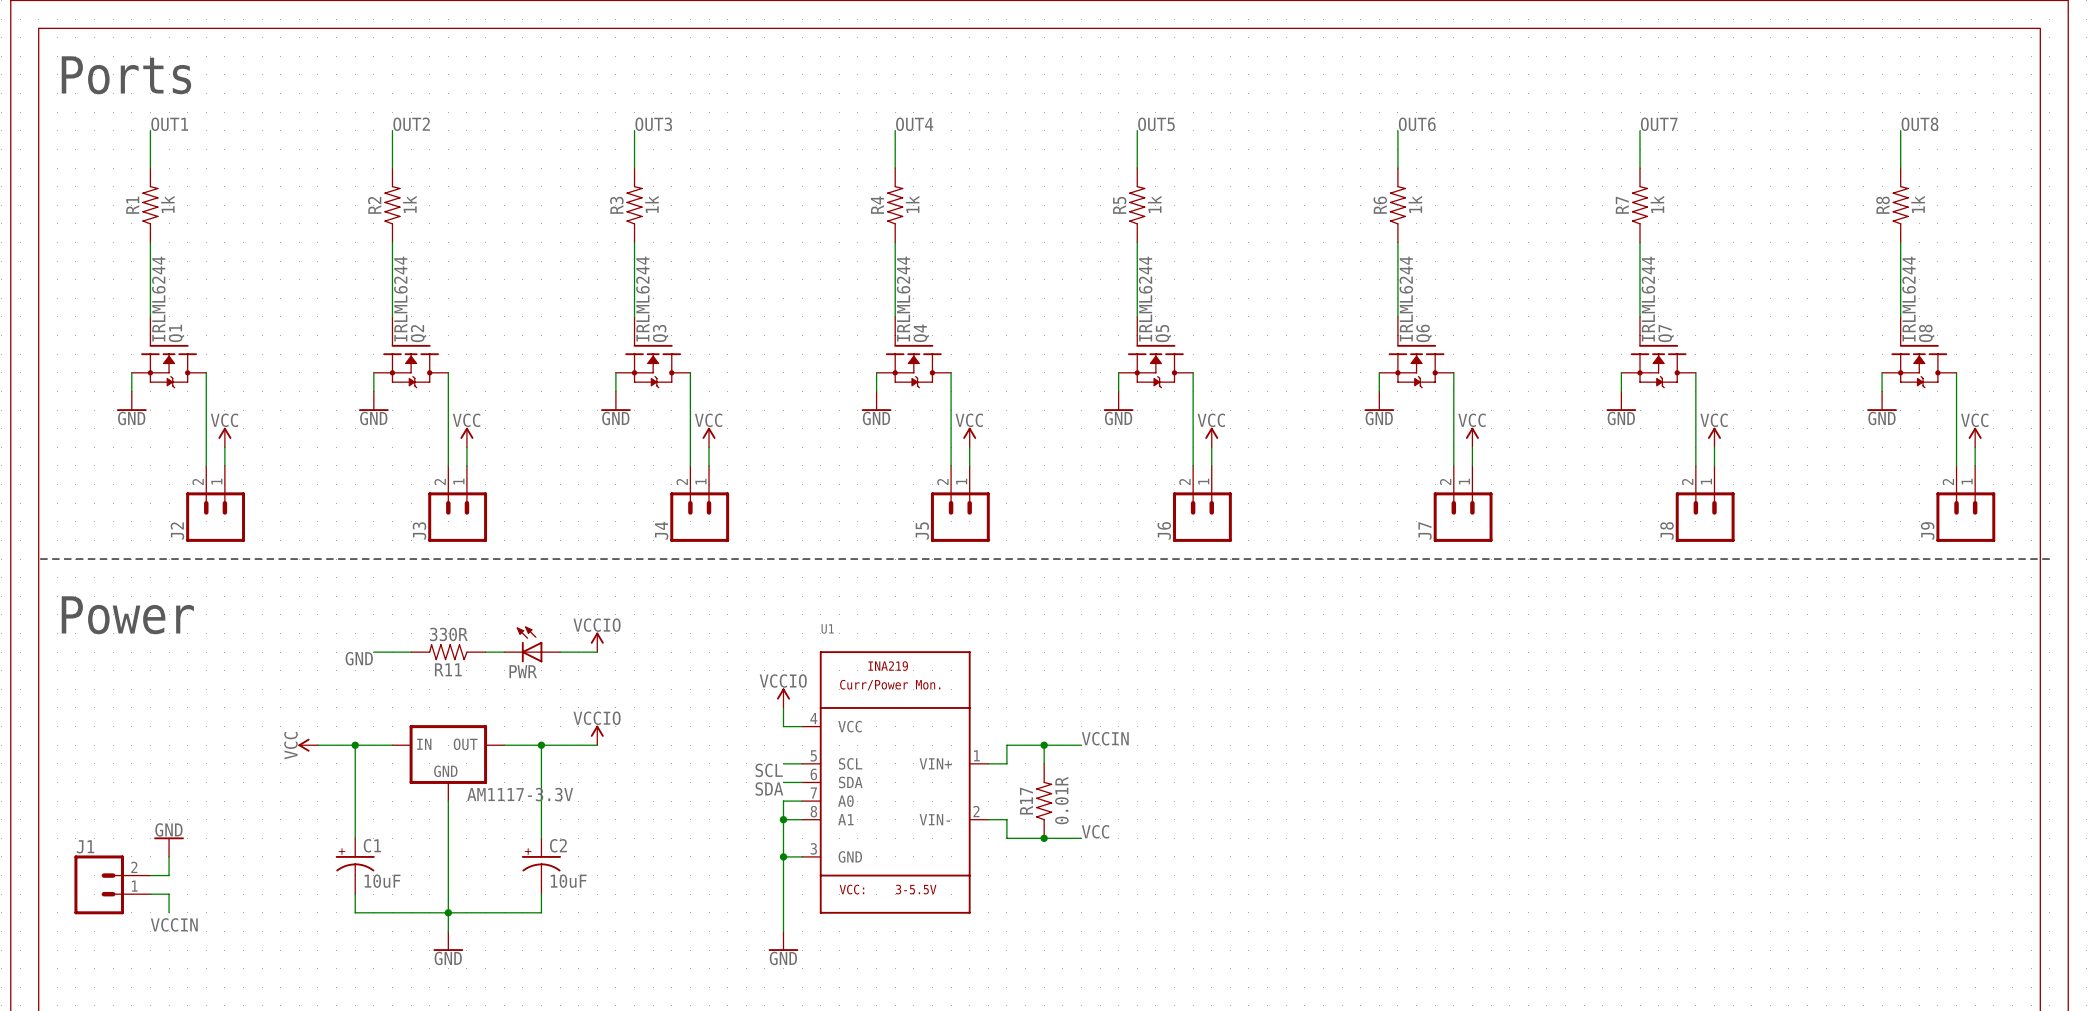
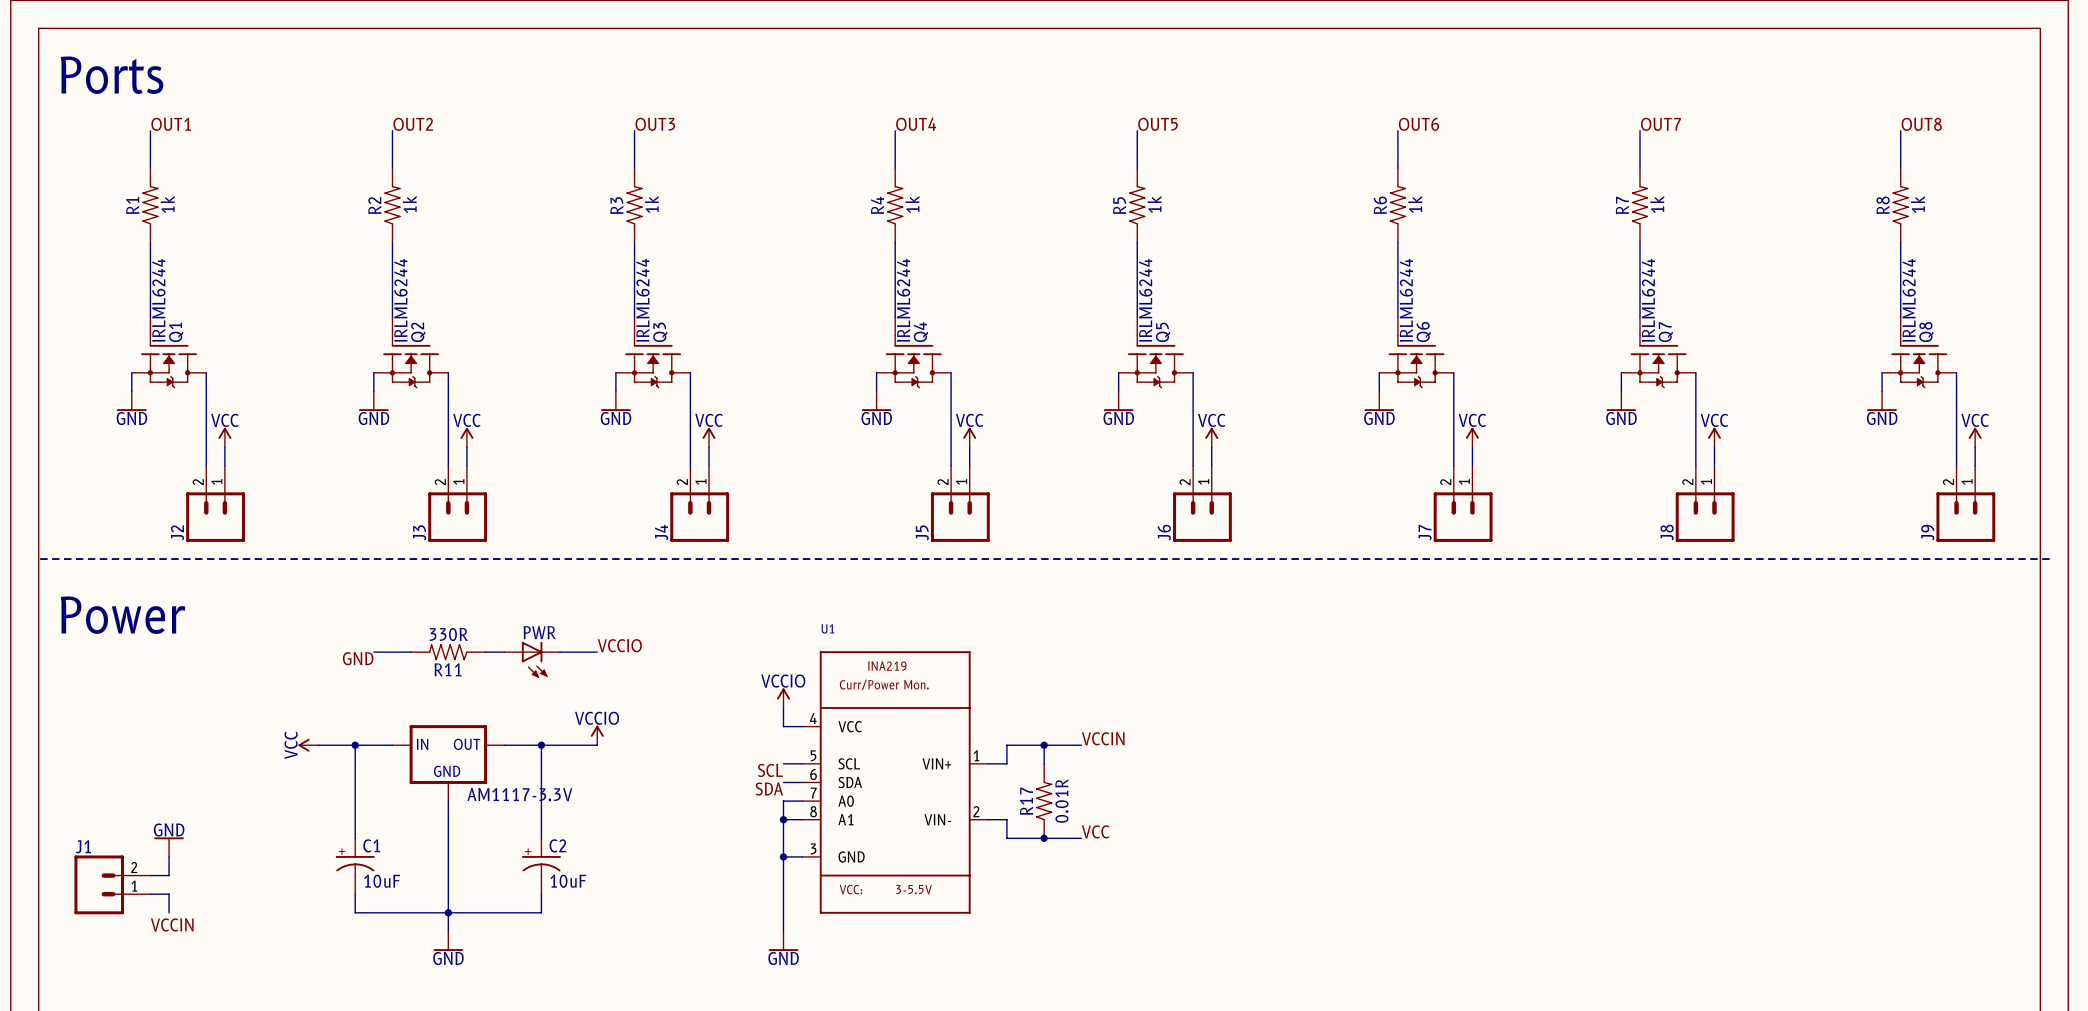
power symbol: VCCIO (597, 642) -> none
PWR rotation: 0° (529, 644) -> 180° (534, 659)
label: none -> VCCIO (619, 645)

